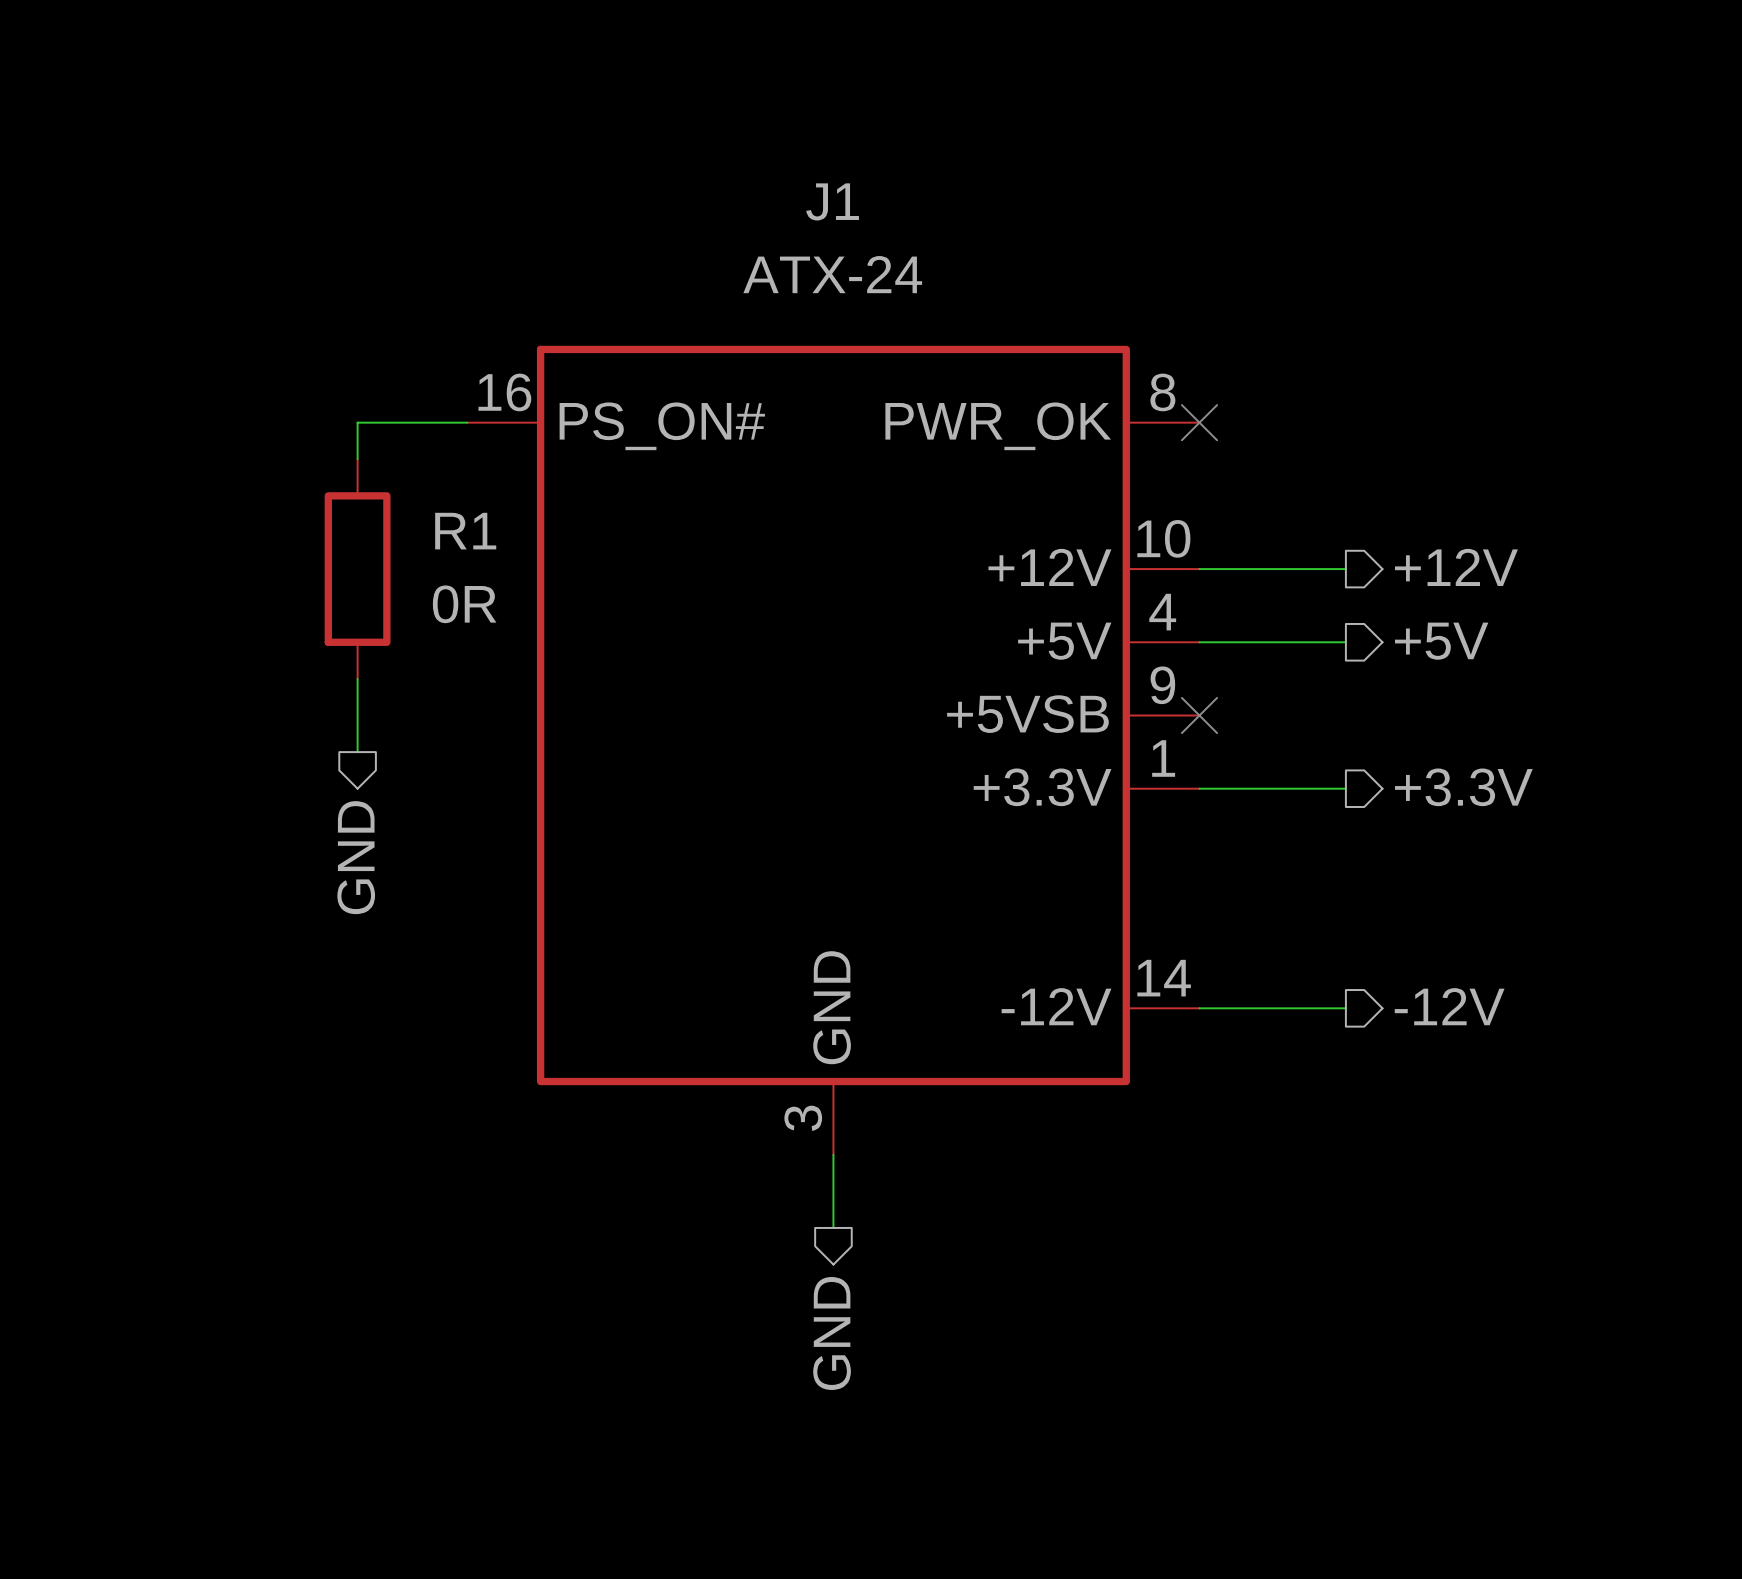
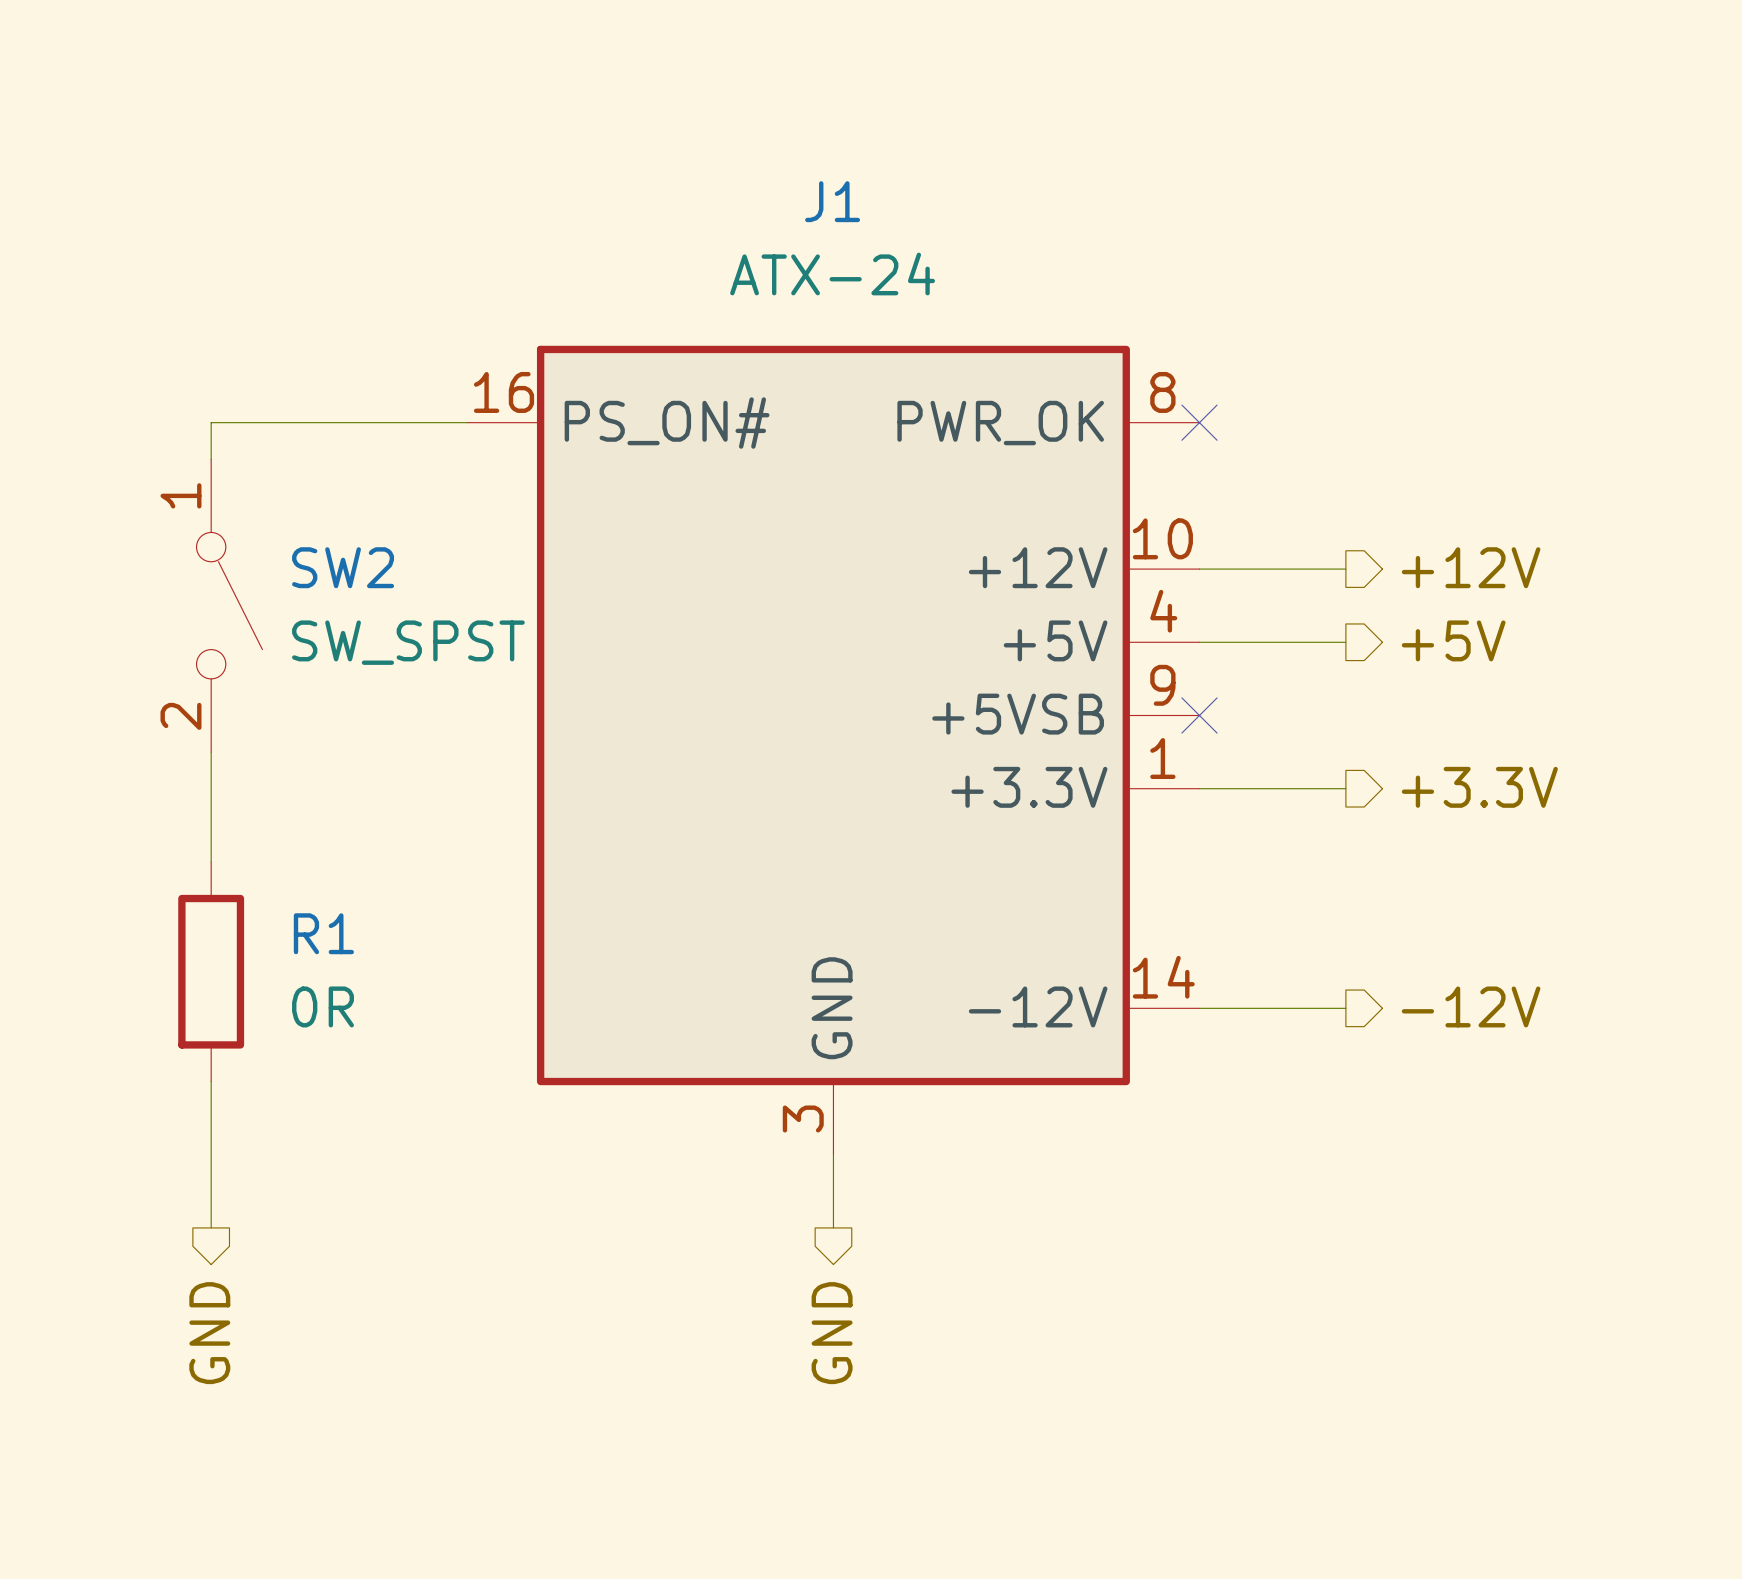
wire: (357, 422) (357, 459) -> (357, 422) (211, 422) (211, 459)
R1 position: (357, 569) -> (211, 971)
SW2: none -> SW_SPST (229, 605)
wire: (357, 678) (357, 752) -> none
wire: none -> (211, 752) (211, 861)
hierarchical label position: GND (356, 857) -> GND (209, 1333)
wire: none -> (211, 1081) (211, 1227)

